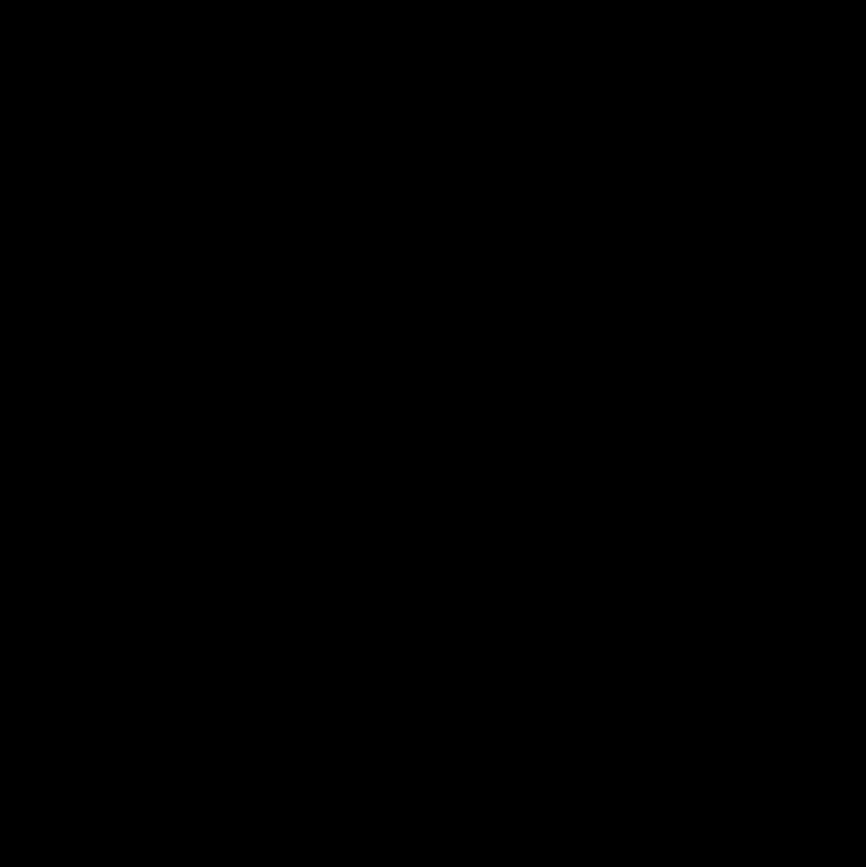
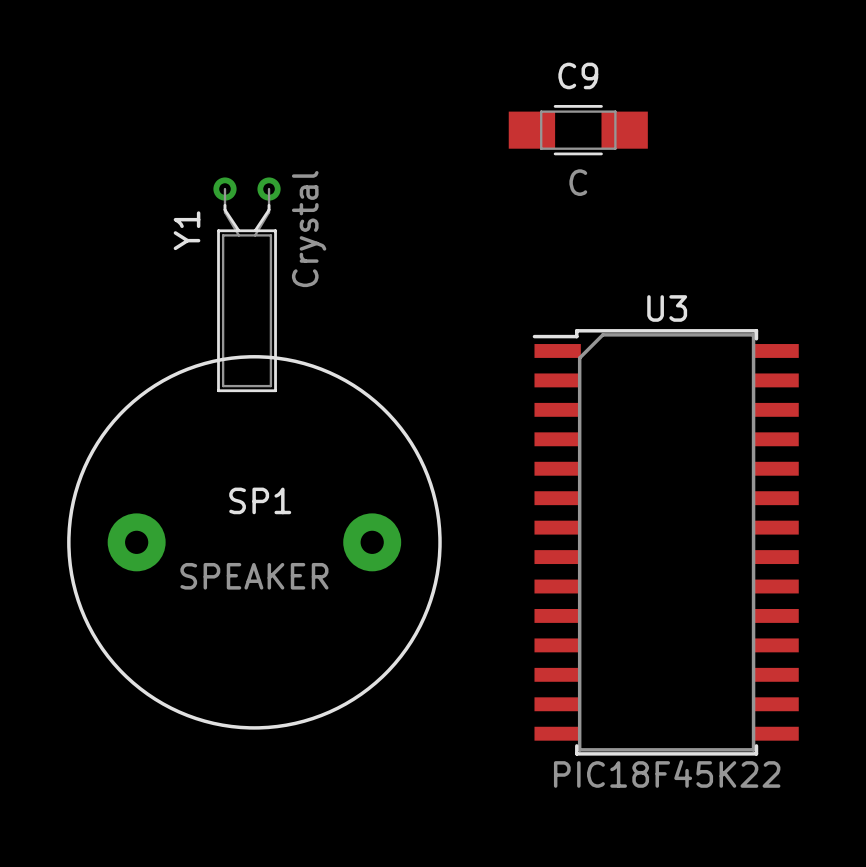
C9: none -> C (578, 130)
Y1: none -> Crystal (247, 284)
SP1: none -> SPEAKER (254, 542)
U3: none -> PIC18F45K22 (665, 542)

